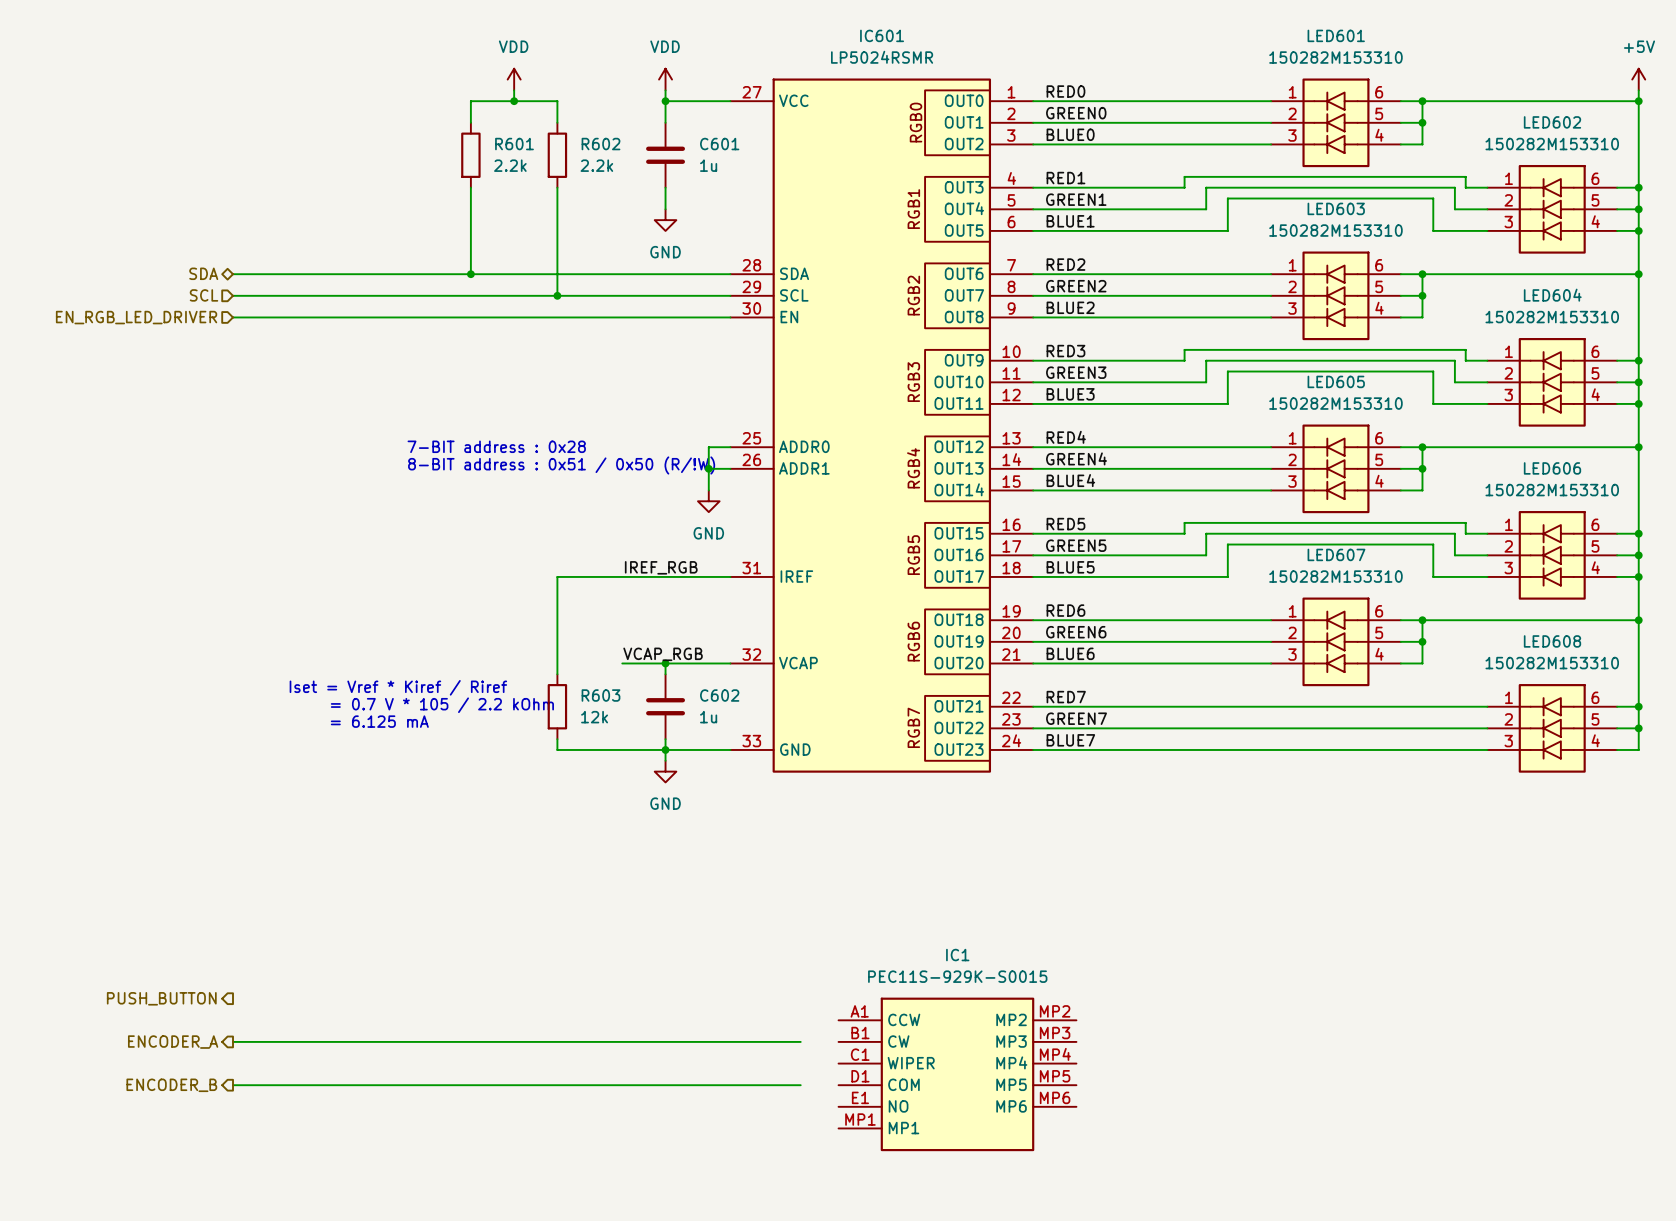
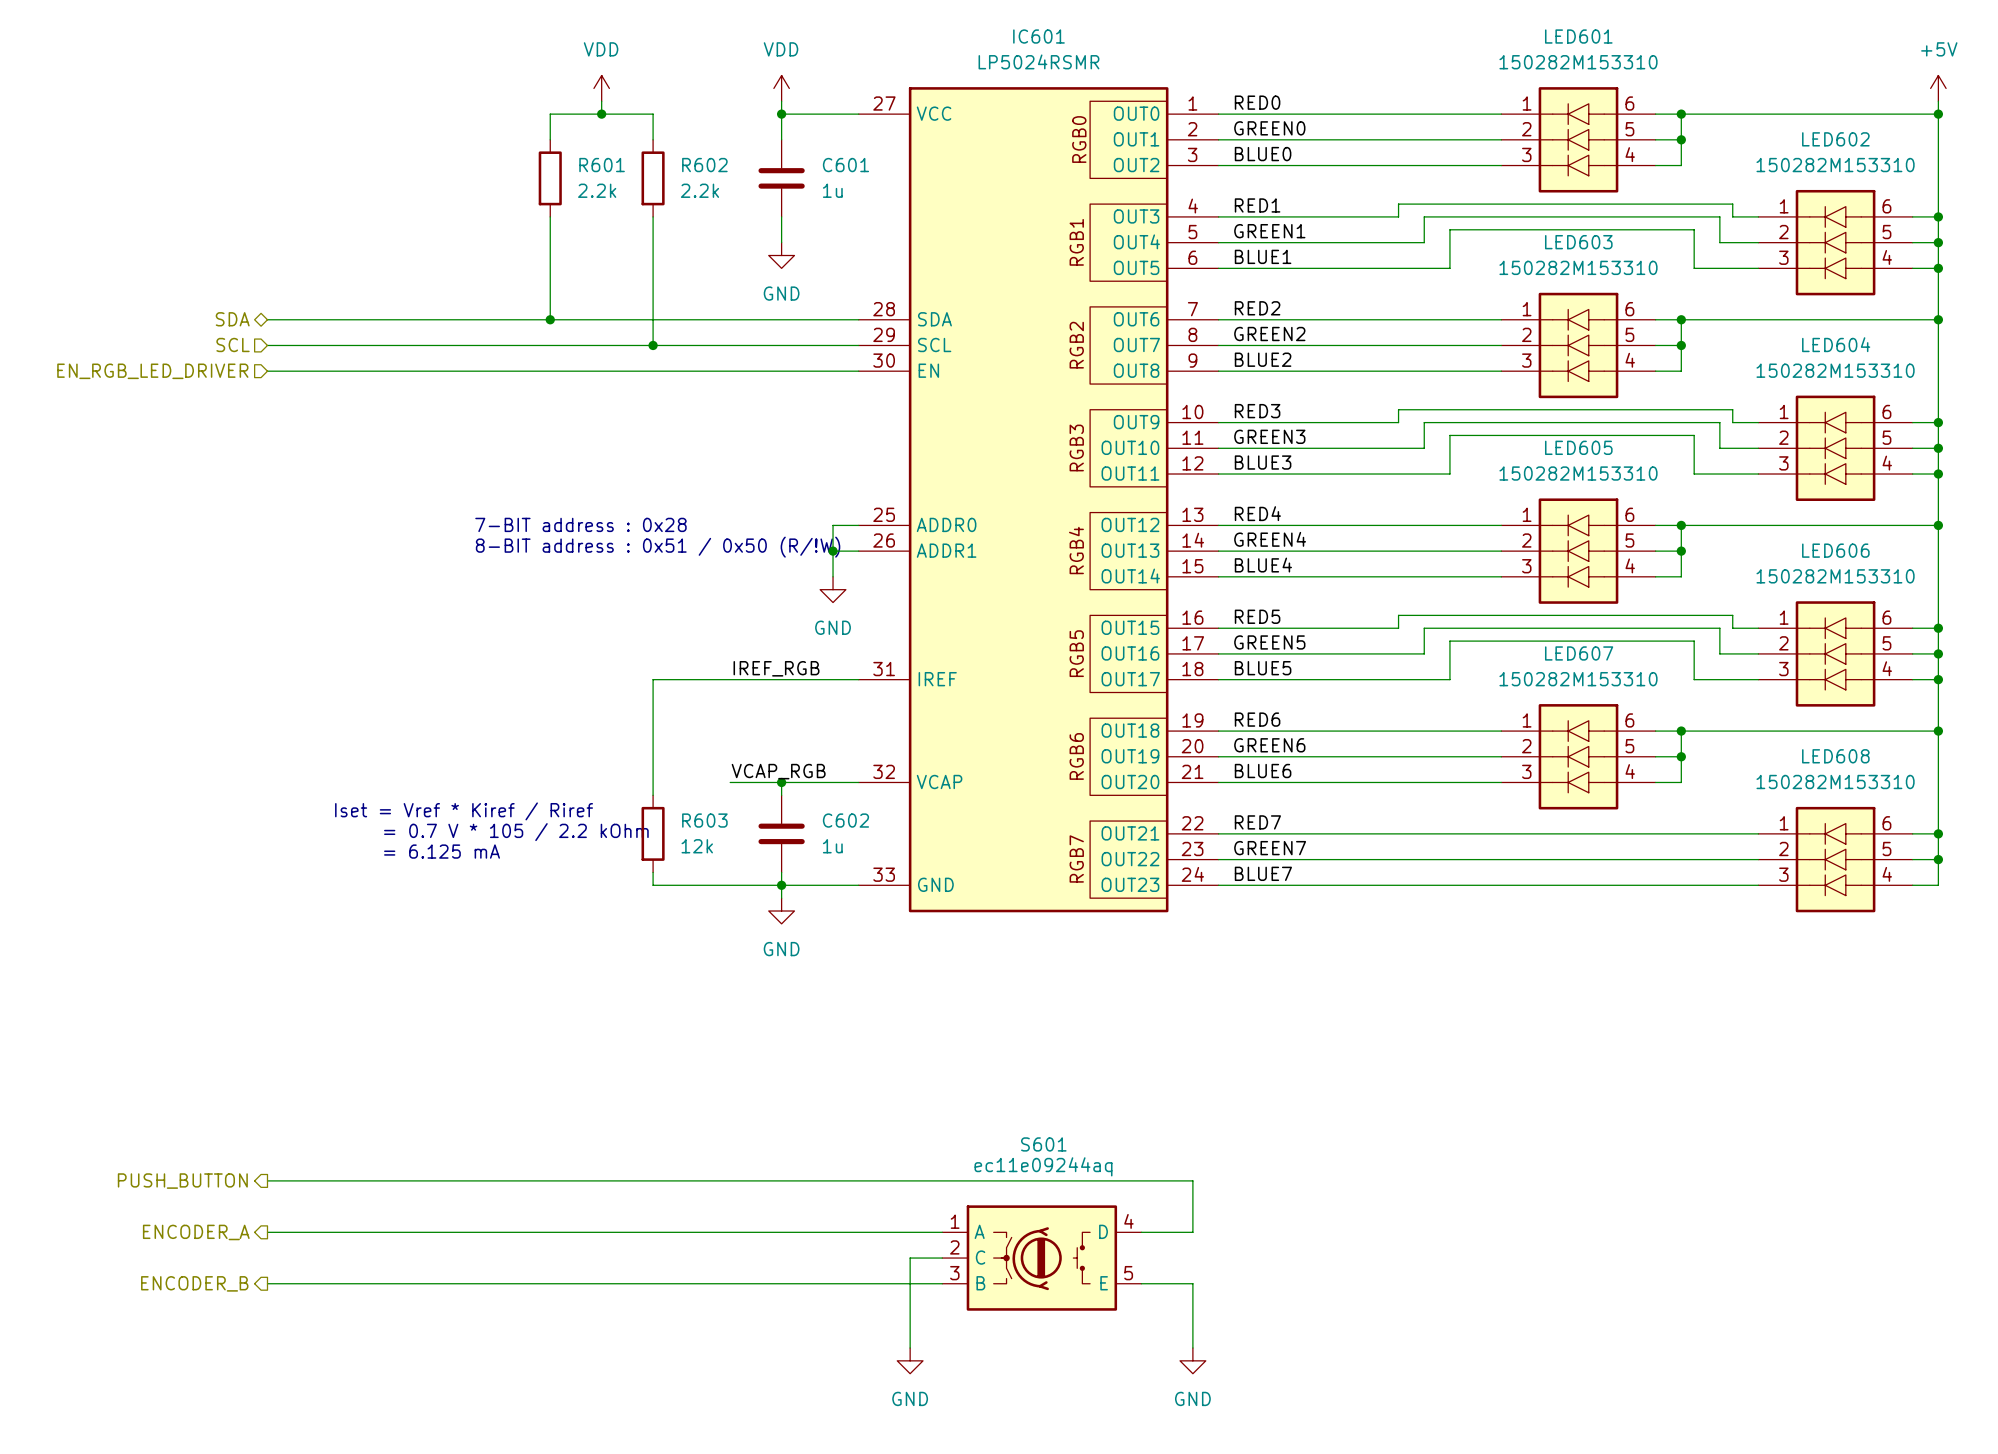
wire: none -> (267, 1180) (1192, 1180) (1192, 1232) (1141, 1232)
wire: none -> (942, 1258) (910, 1258) (910, 1348)
S601: none -> ec11e09244aq (1041, 1258)
IC1: PEC11S-929K-S0015 (957, 1074) -> none
power symbol: none -> GND (910, 1360)
power symbol: none -> GND (1192, 1360)

